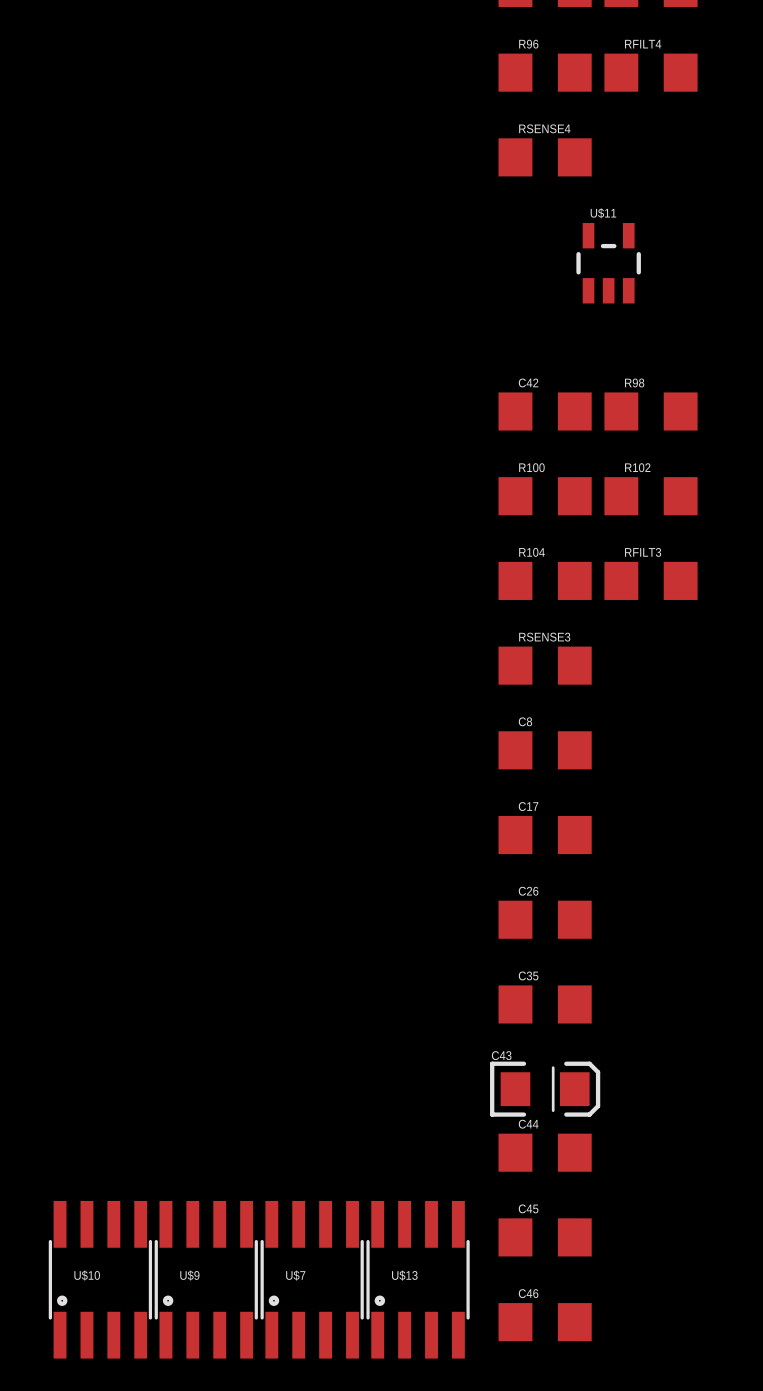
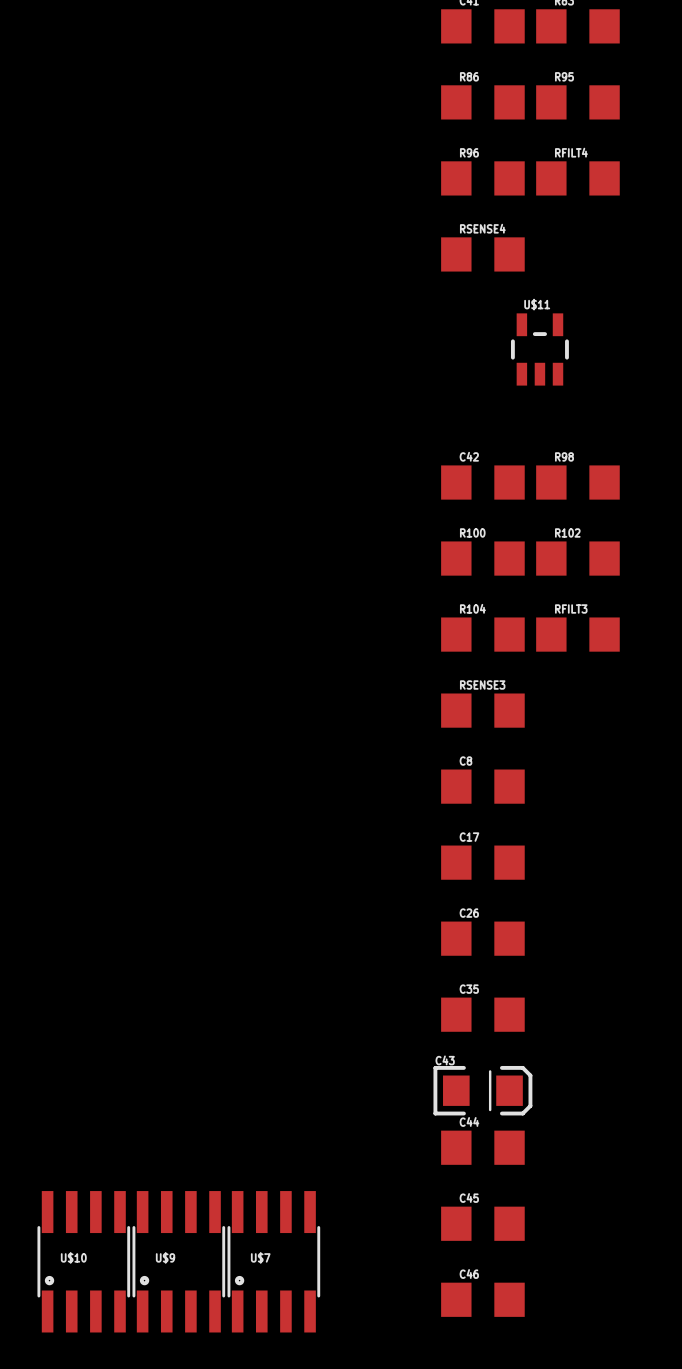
U$13: (418, 1279) -> none

